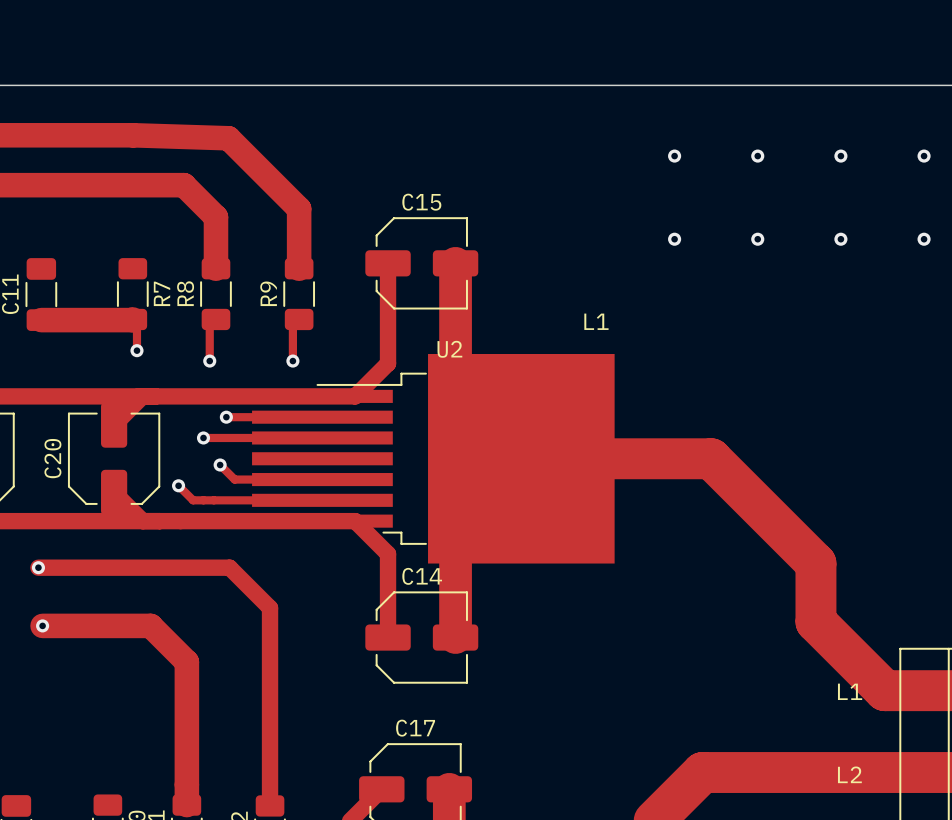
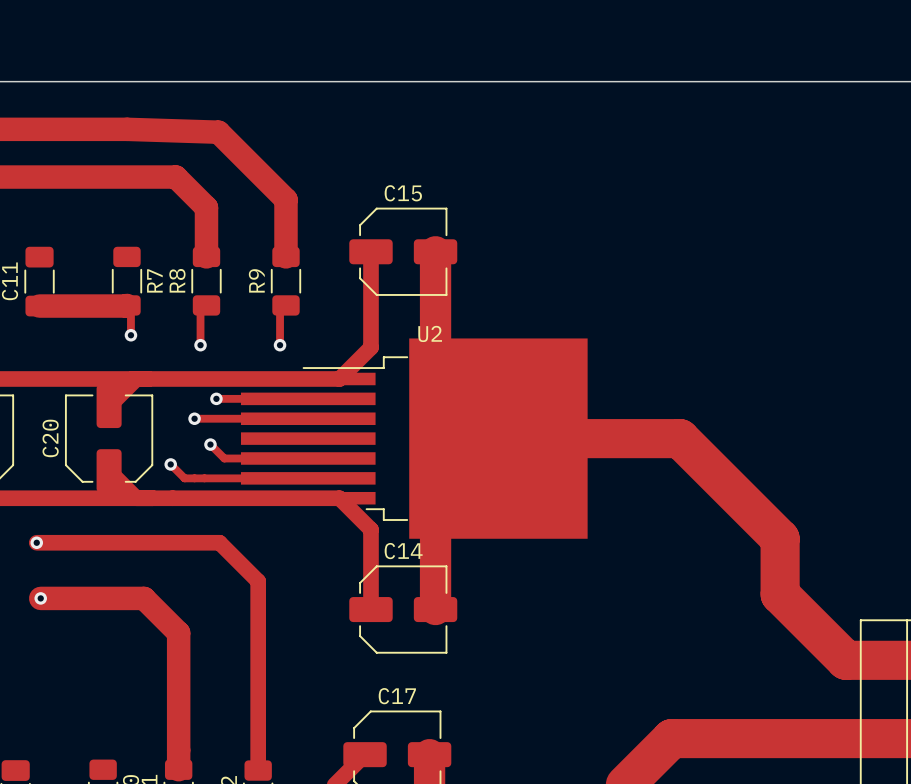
via: (674, 156) -> none
via: (757, 156) -> none
via: (840, 156) -> none
via: (924, 156) -> none
via: (674, 239) -> none
via: (757, 239) -> none
via: (840, 239) -> none
via: (924, 239) -> none
text: L1 (596, 321) -> none
text: L1 (850, 691) -> none
text: L2 (849, 774) -> none

